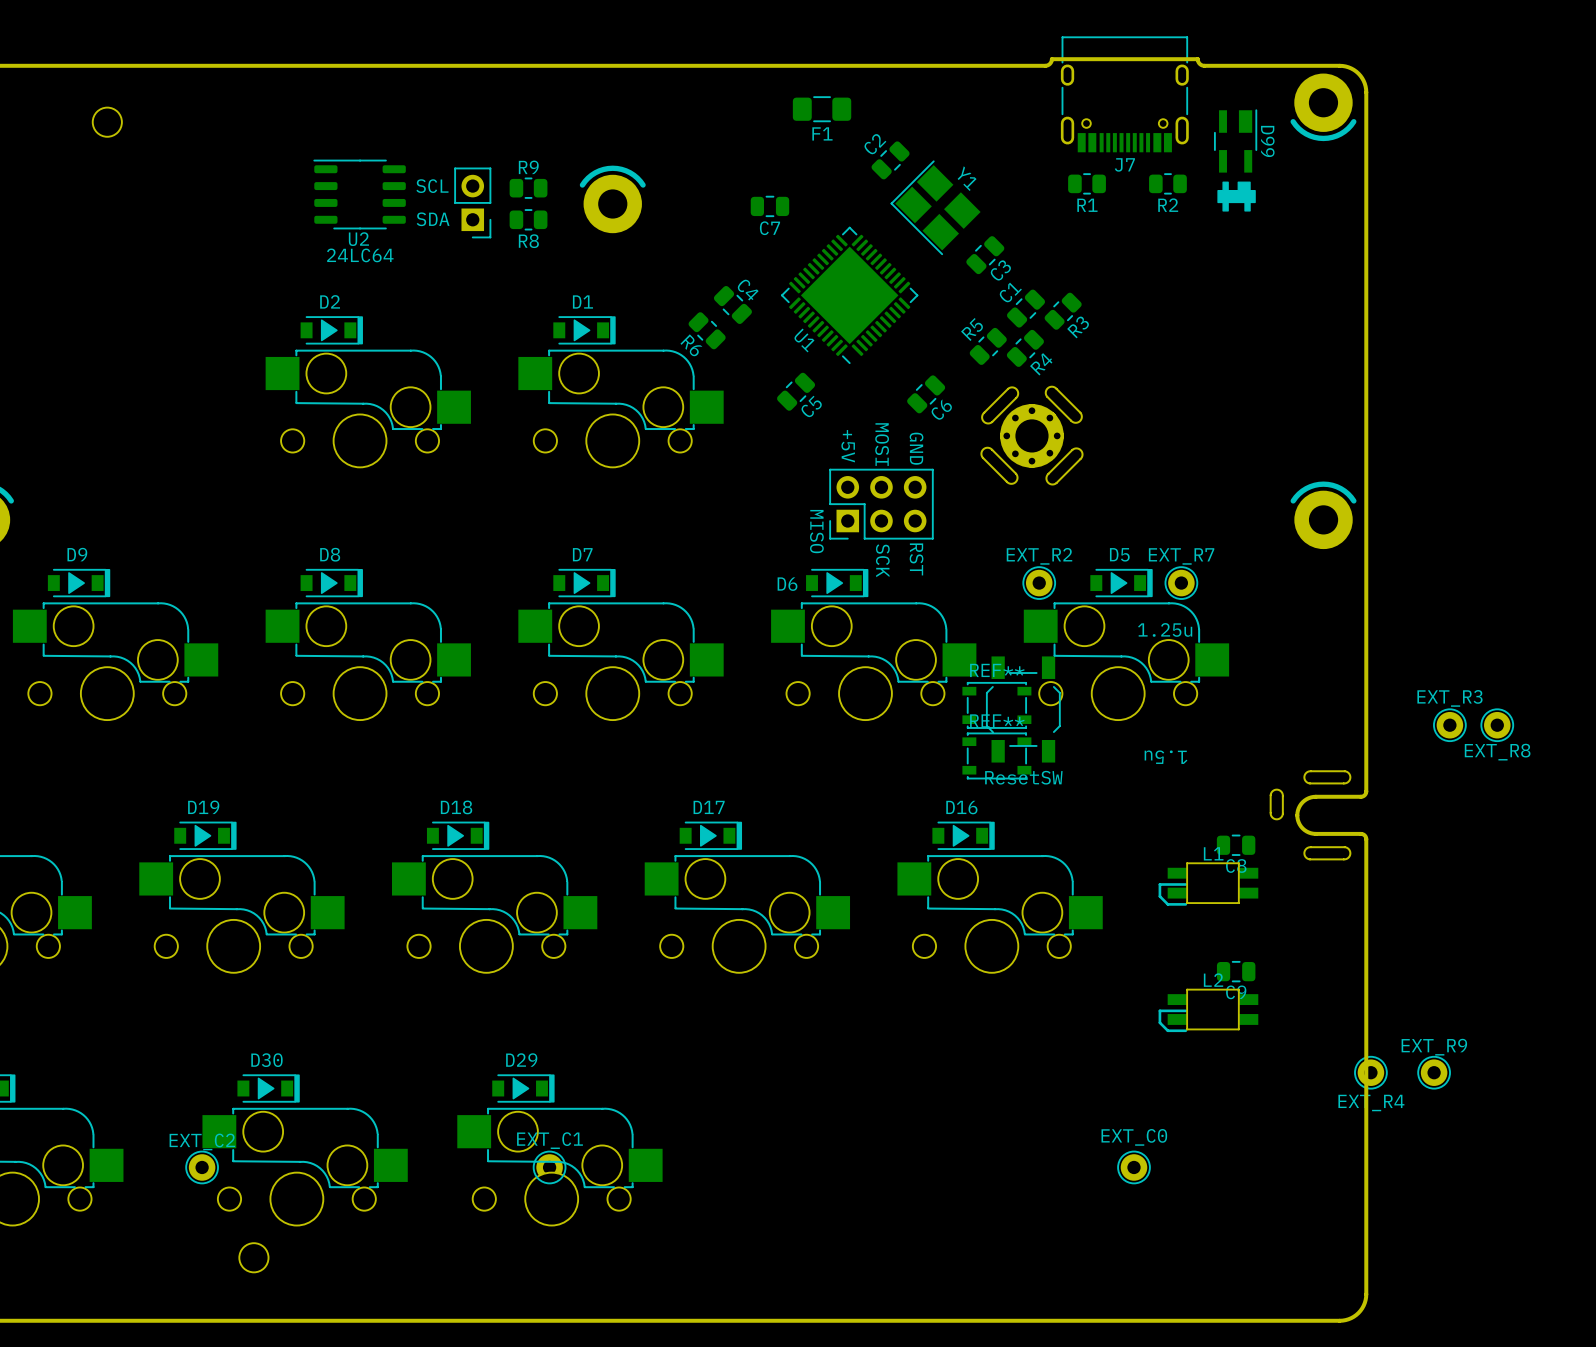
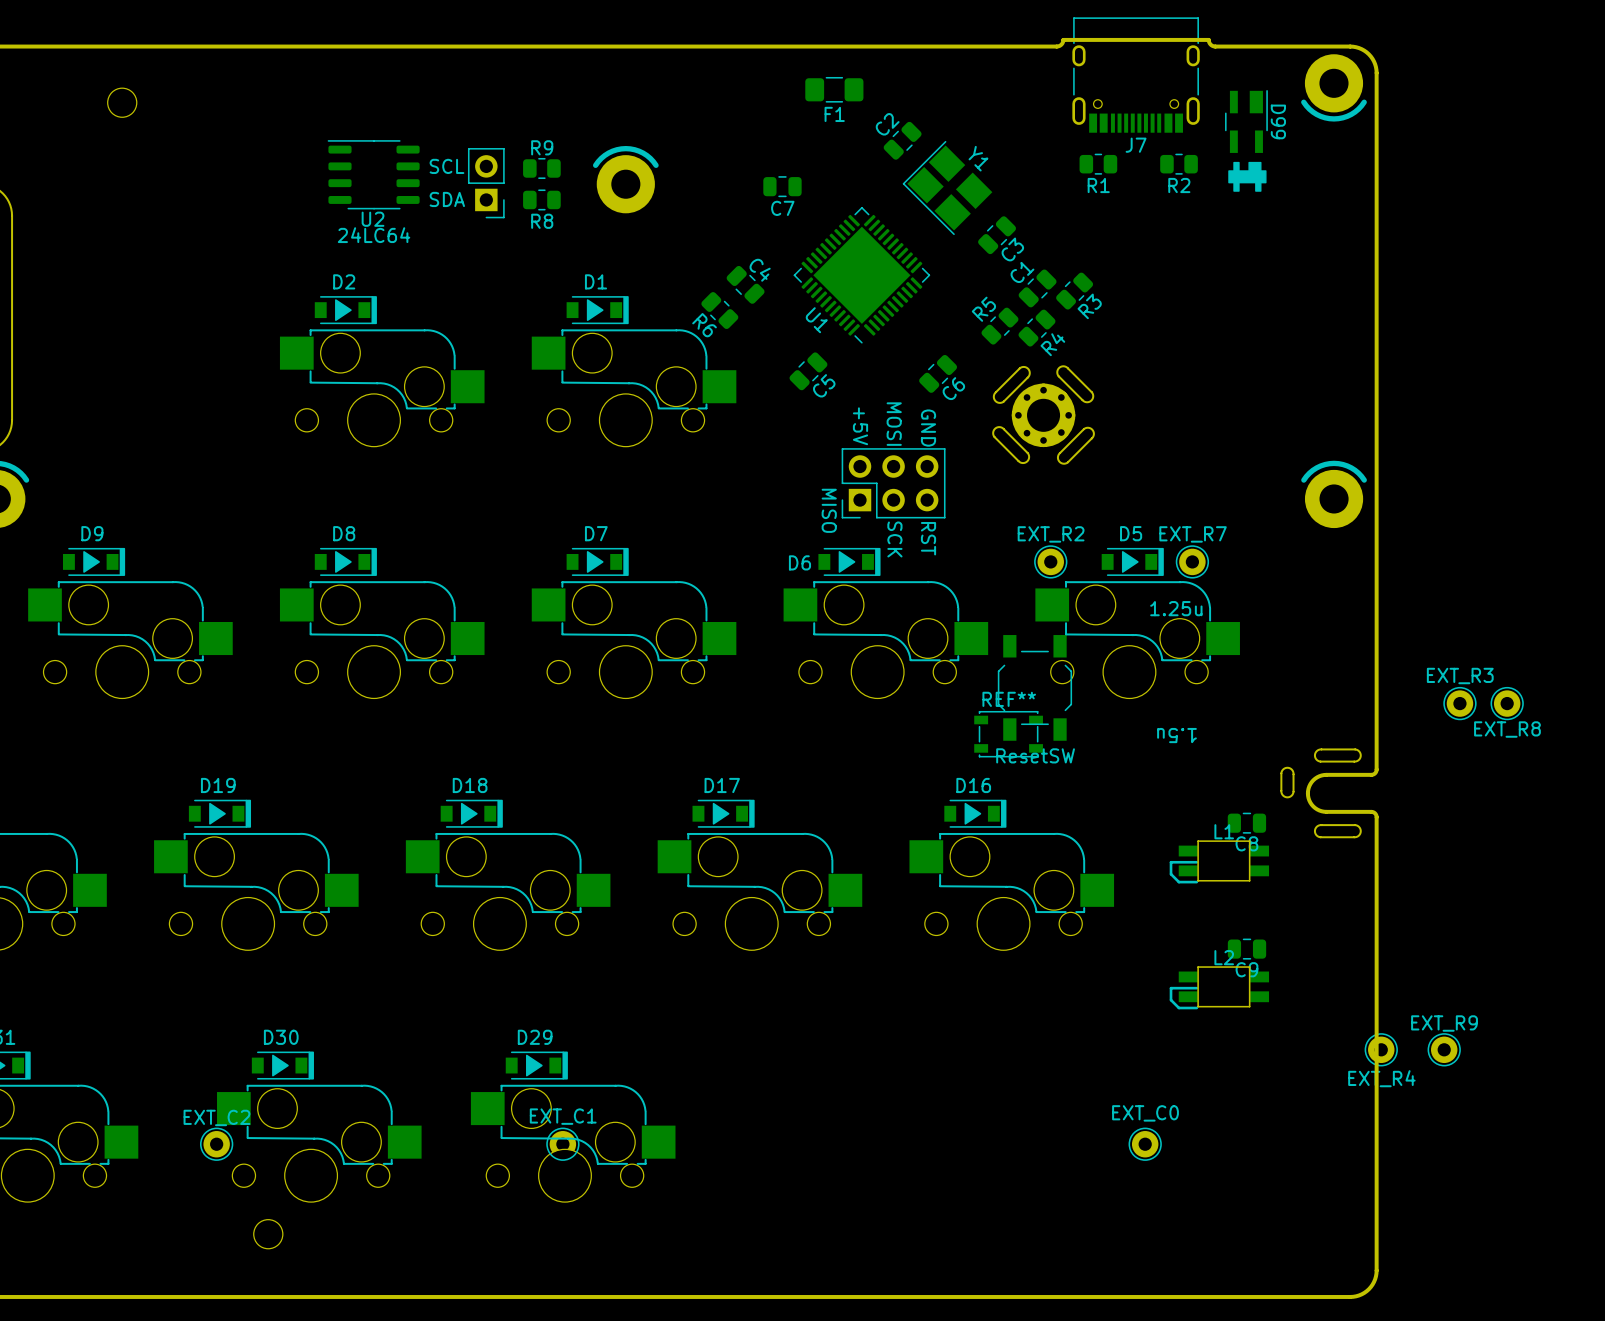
REF**: (996, 705) -> none

